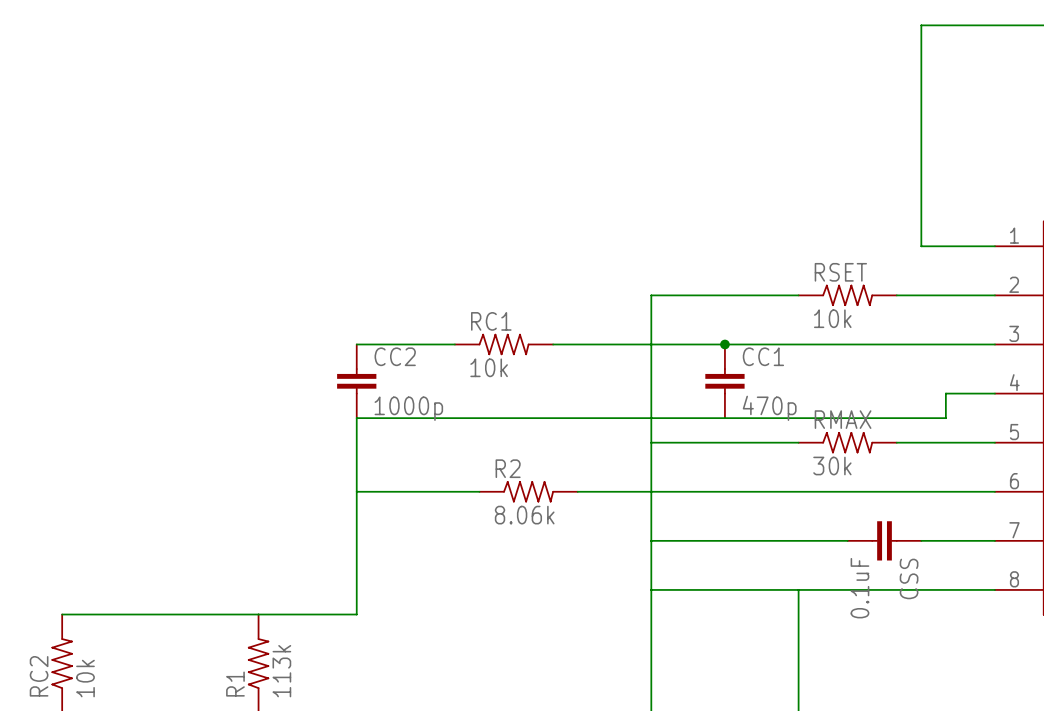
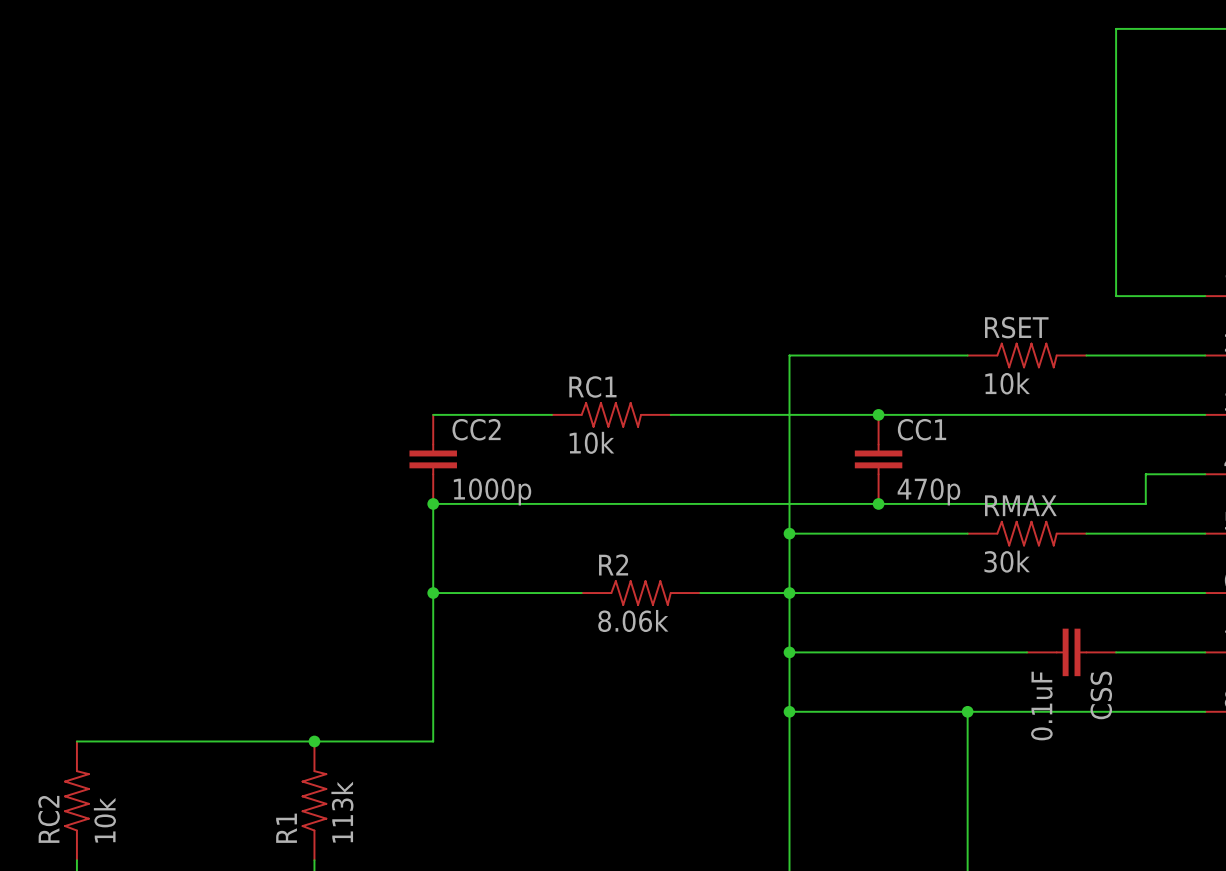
junction: none -> (433, 503)
junction: none -> (878, 503)
junction: none -> (789, 533)
junction: none -> (433, 593)
junction: none -> (789, 593)
junction: none -> (789, 652)
junction: none -> (789, 711)
junction: none -> (967, 711)
junction: none -> (314, 741)

